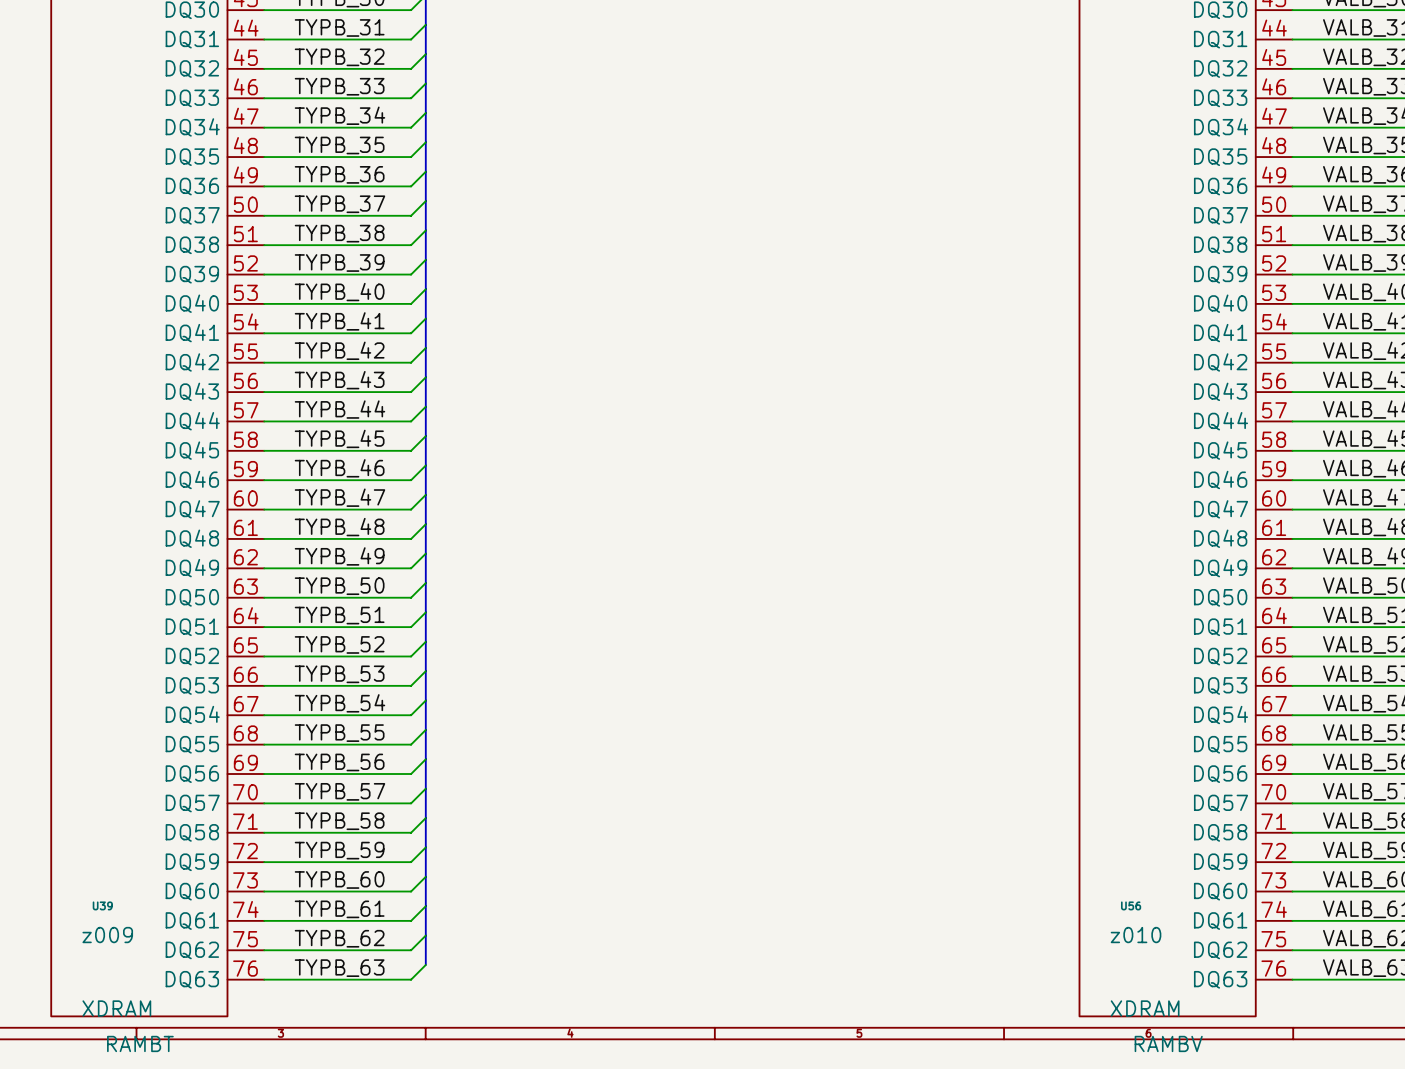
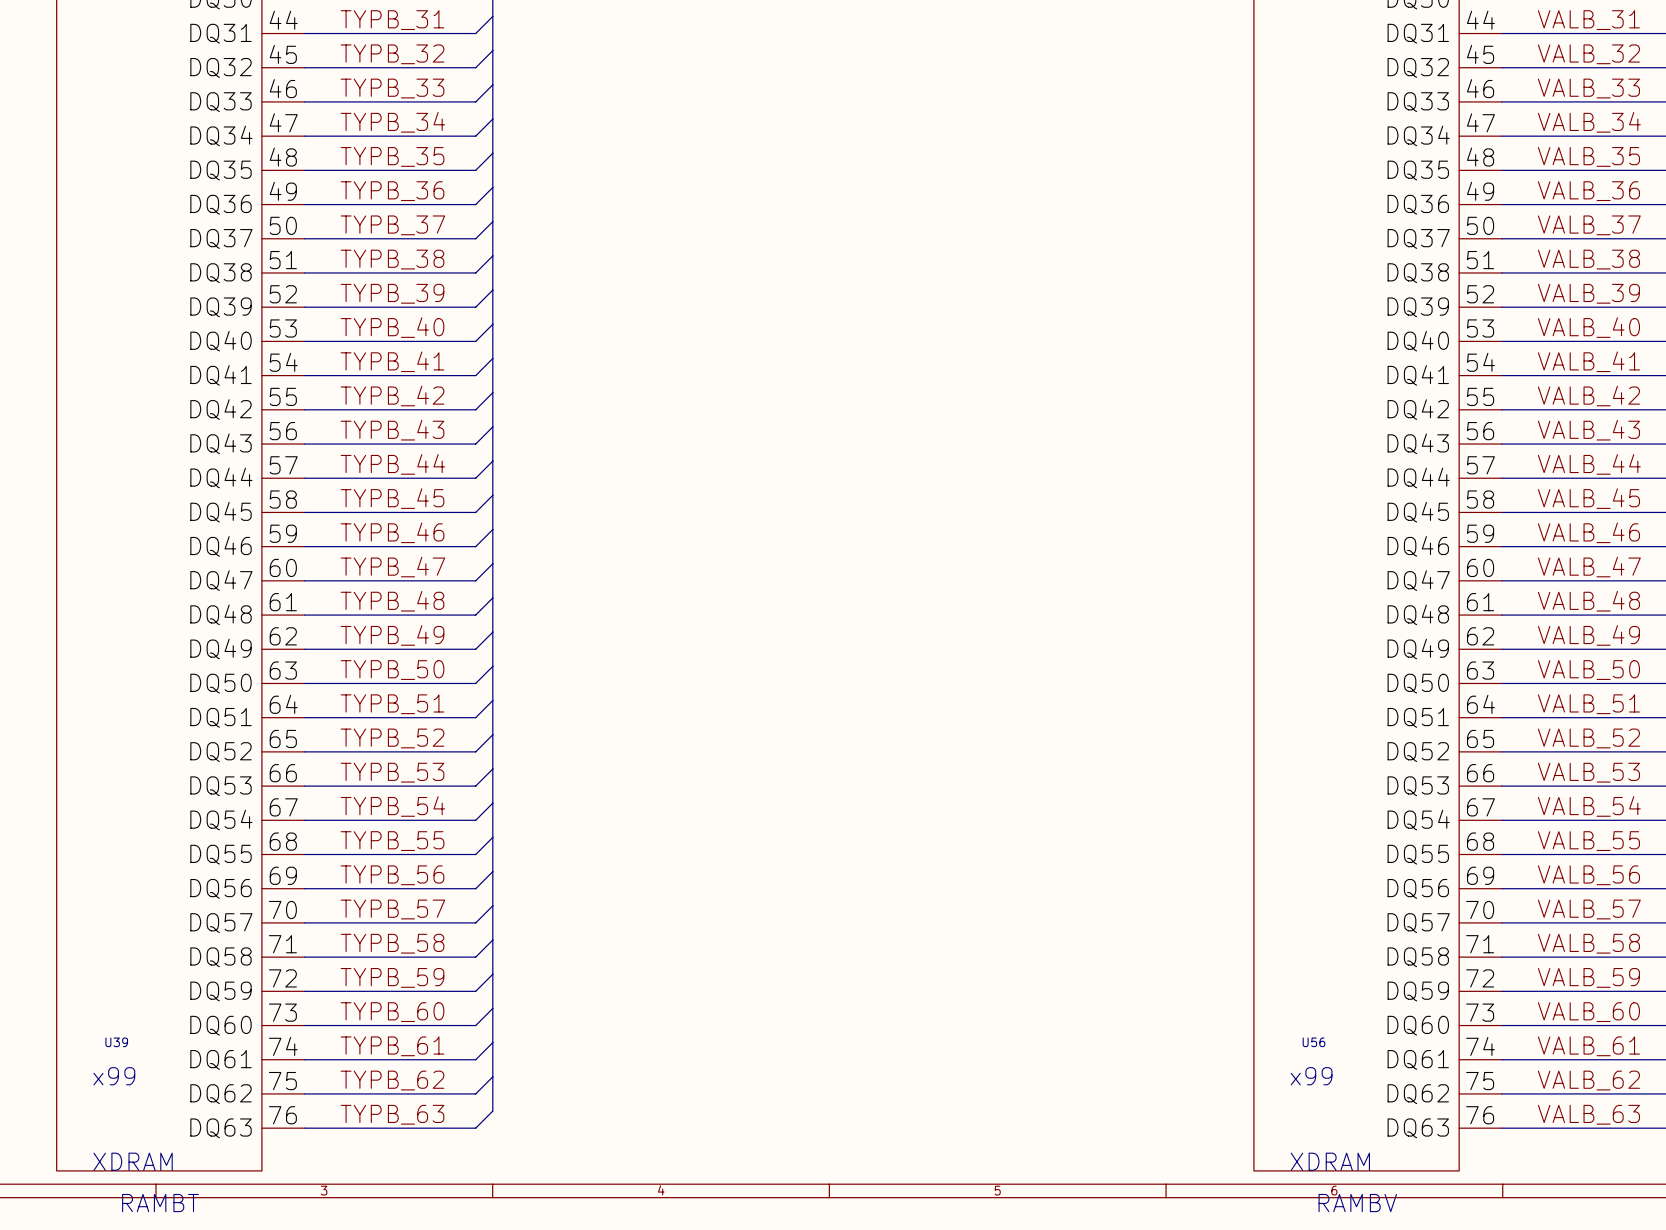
U39 text: z009 (107, 935) -> x99 (114, 1076)
U56 text: z010 (1136, 935) -> x99 (1311, 1076)

